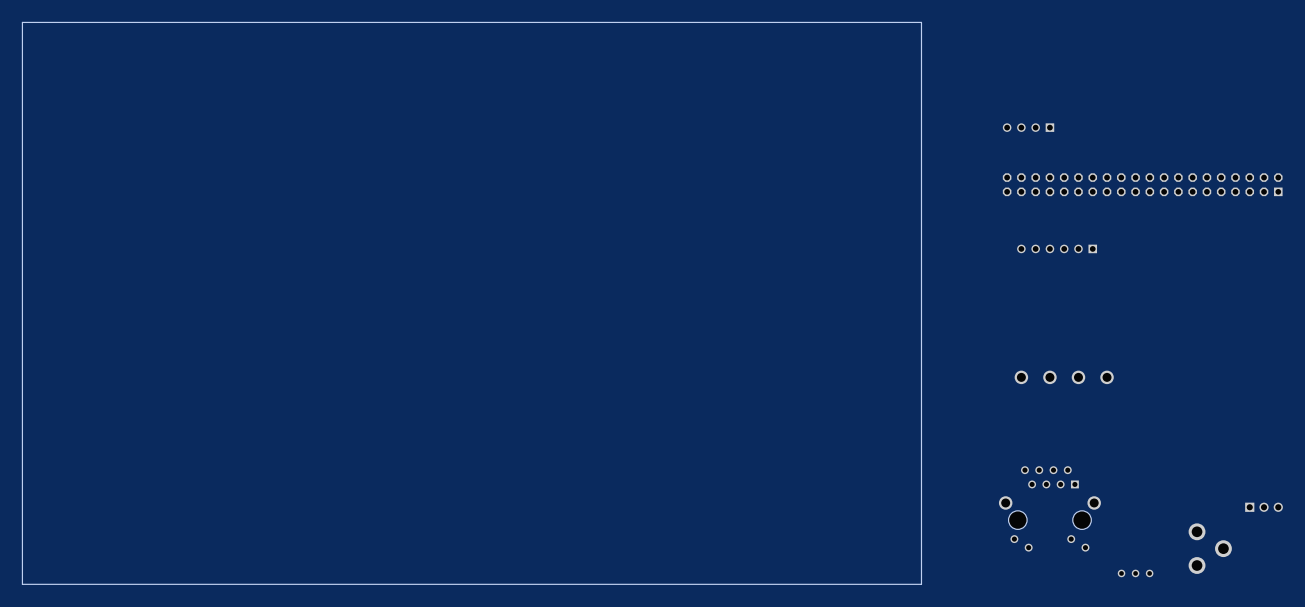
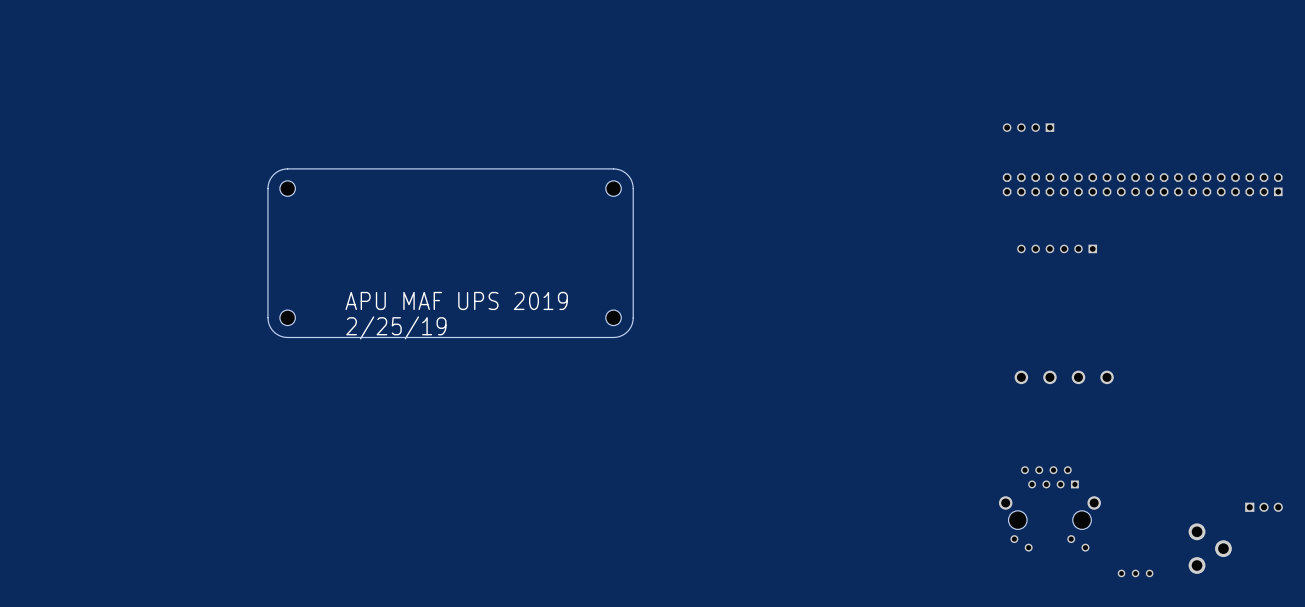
board edge: (921, 22) (22, 22) (22, 584) (921, 584) (921, 22) -> none
board edge: none -> (613, 168) (280, 170) (272, 176) (268, 186) (269, 325) (277, 334) (287, 337) (621, 335) (629, 329) (633, 320) (633, 188) (627, 174) (613, 168)
hole: none -> (287, 188)
hole: none -> (613, 188)
text: none -> APU MAF UPS 2019 (456, 300)
hole: none -> (287, 317)
hole: none -> (613, 317)
text: none -> 2/25/19 (396, 327)

